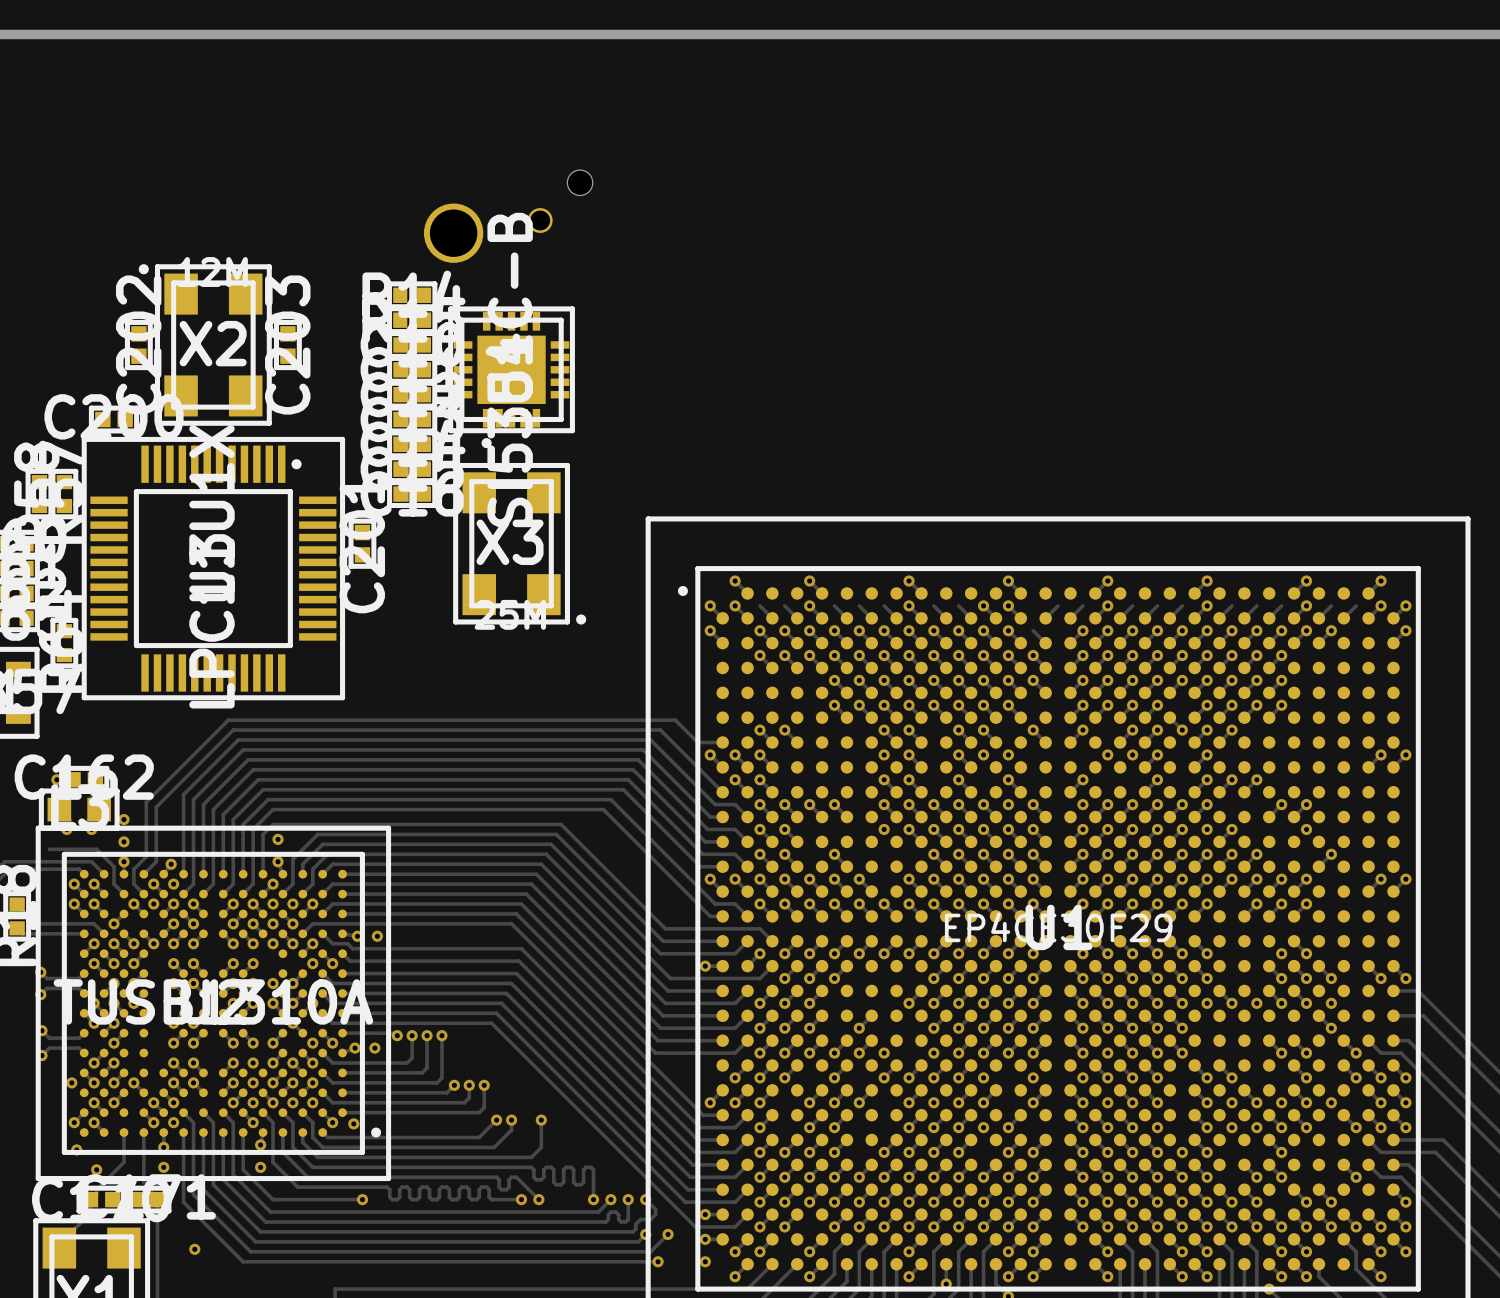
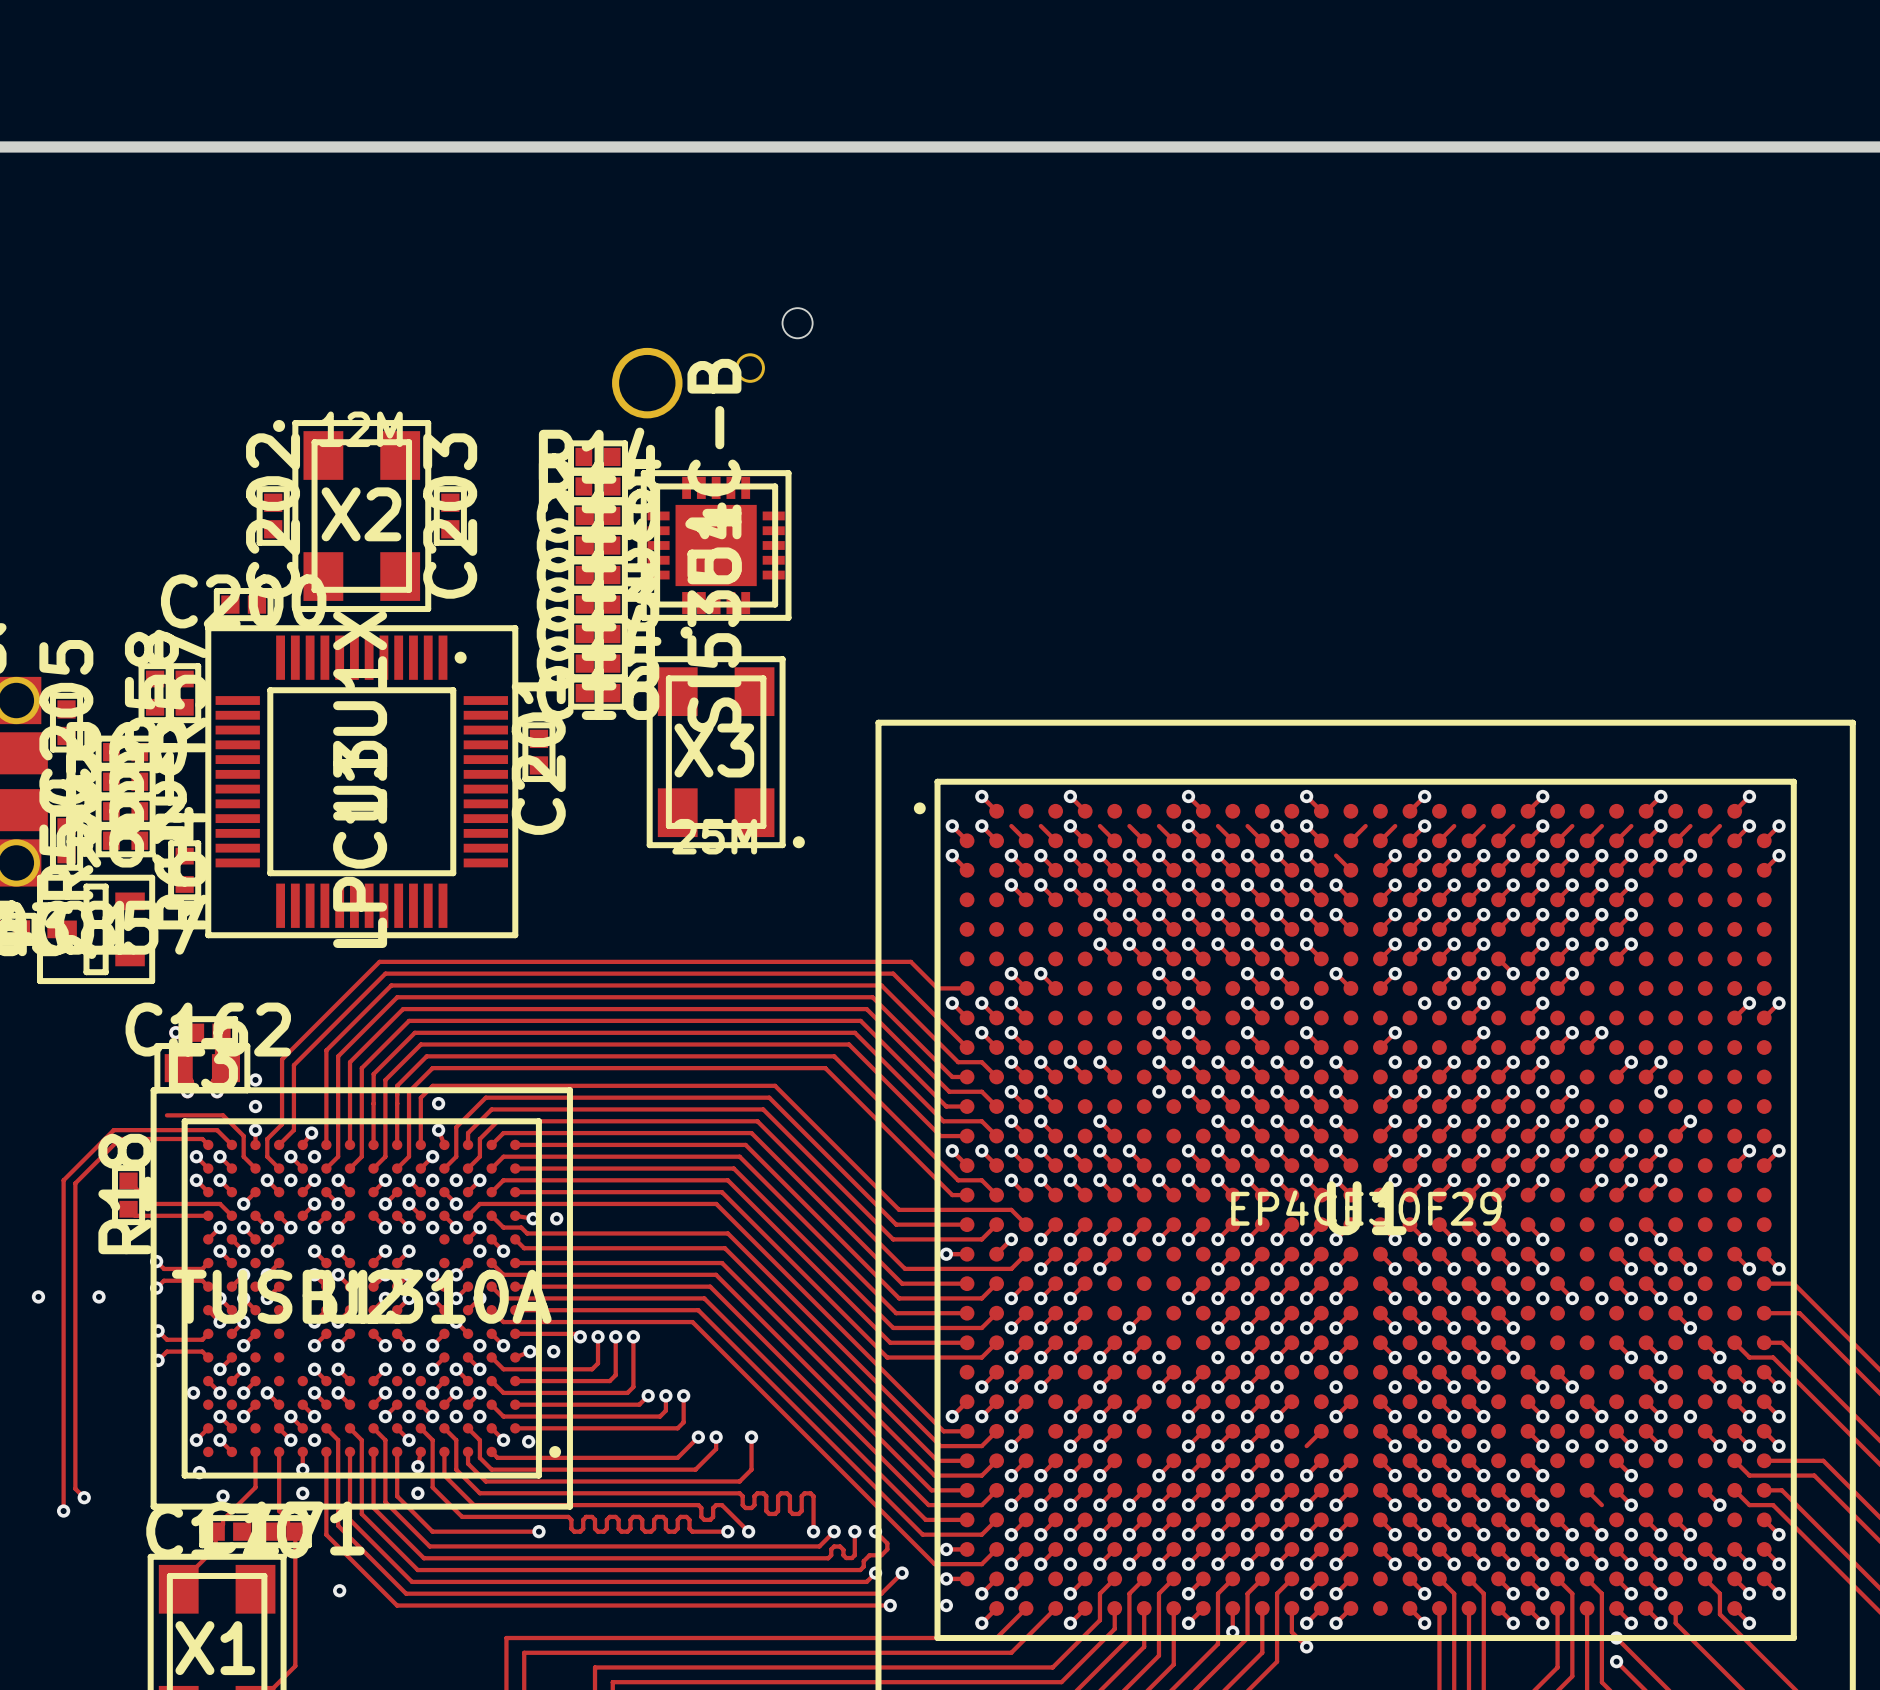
via position: (1008, 1127) -> (1277, 1475)
via position: (1256, 1177) -> (1631, 1534)
via: none -> (1070, 1564)

